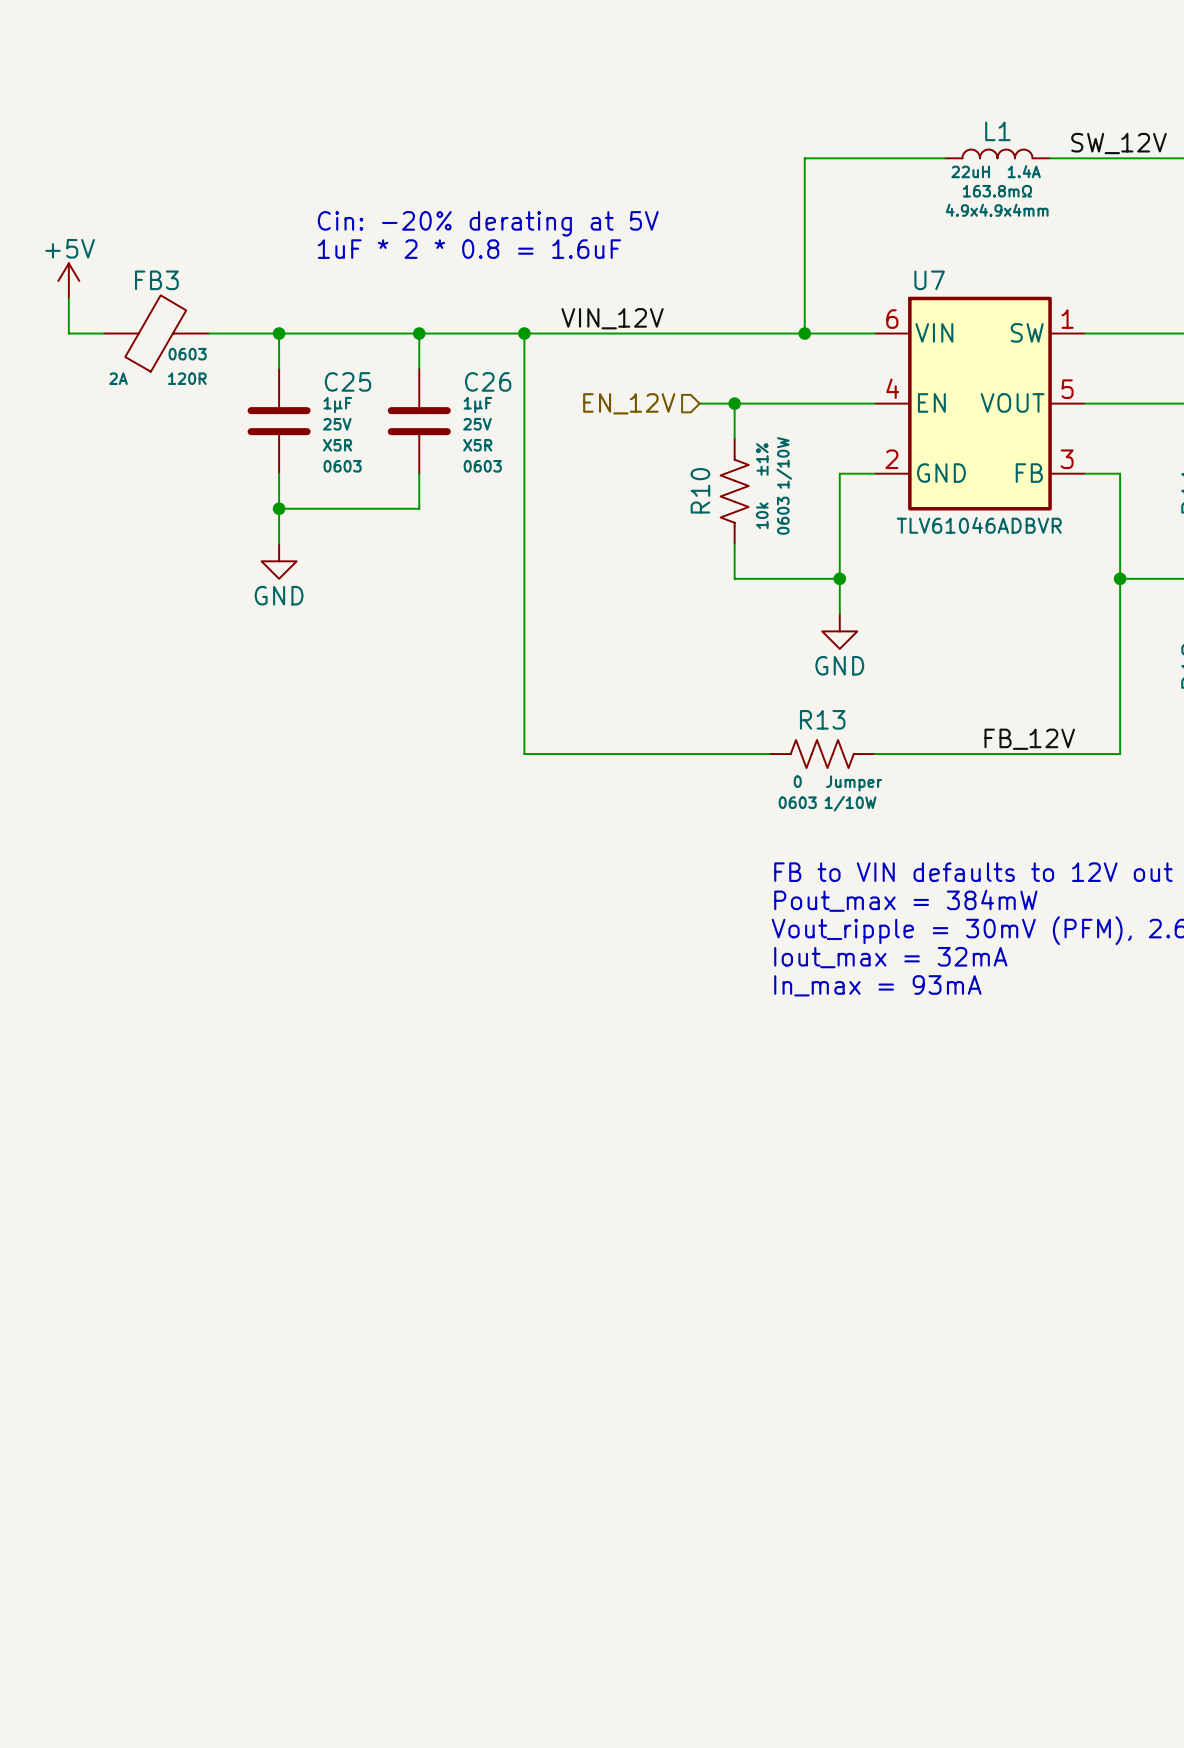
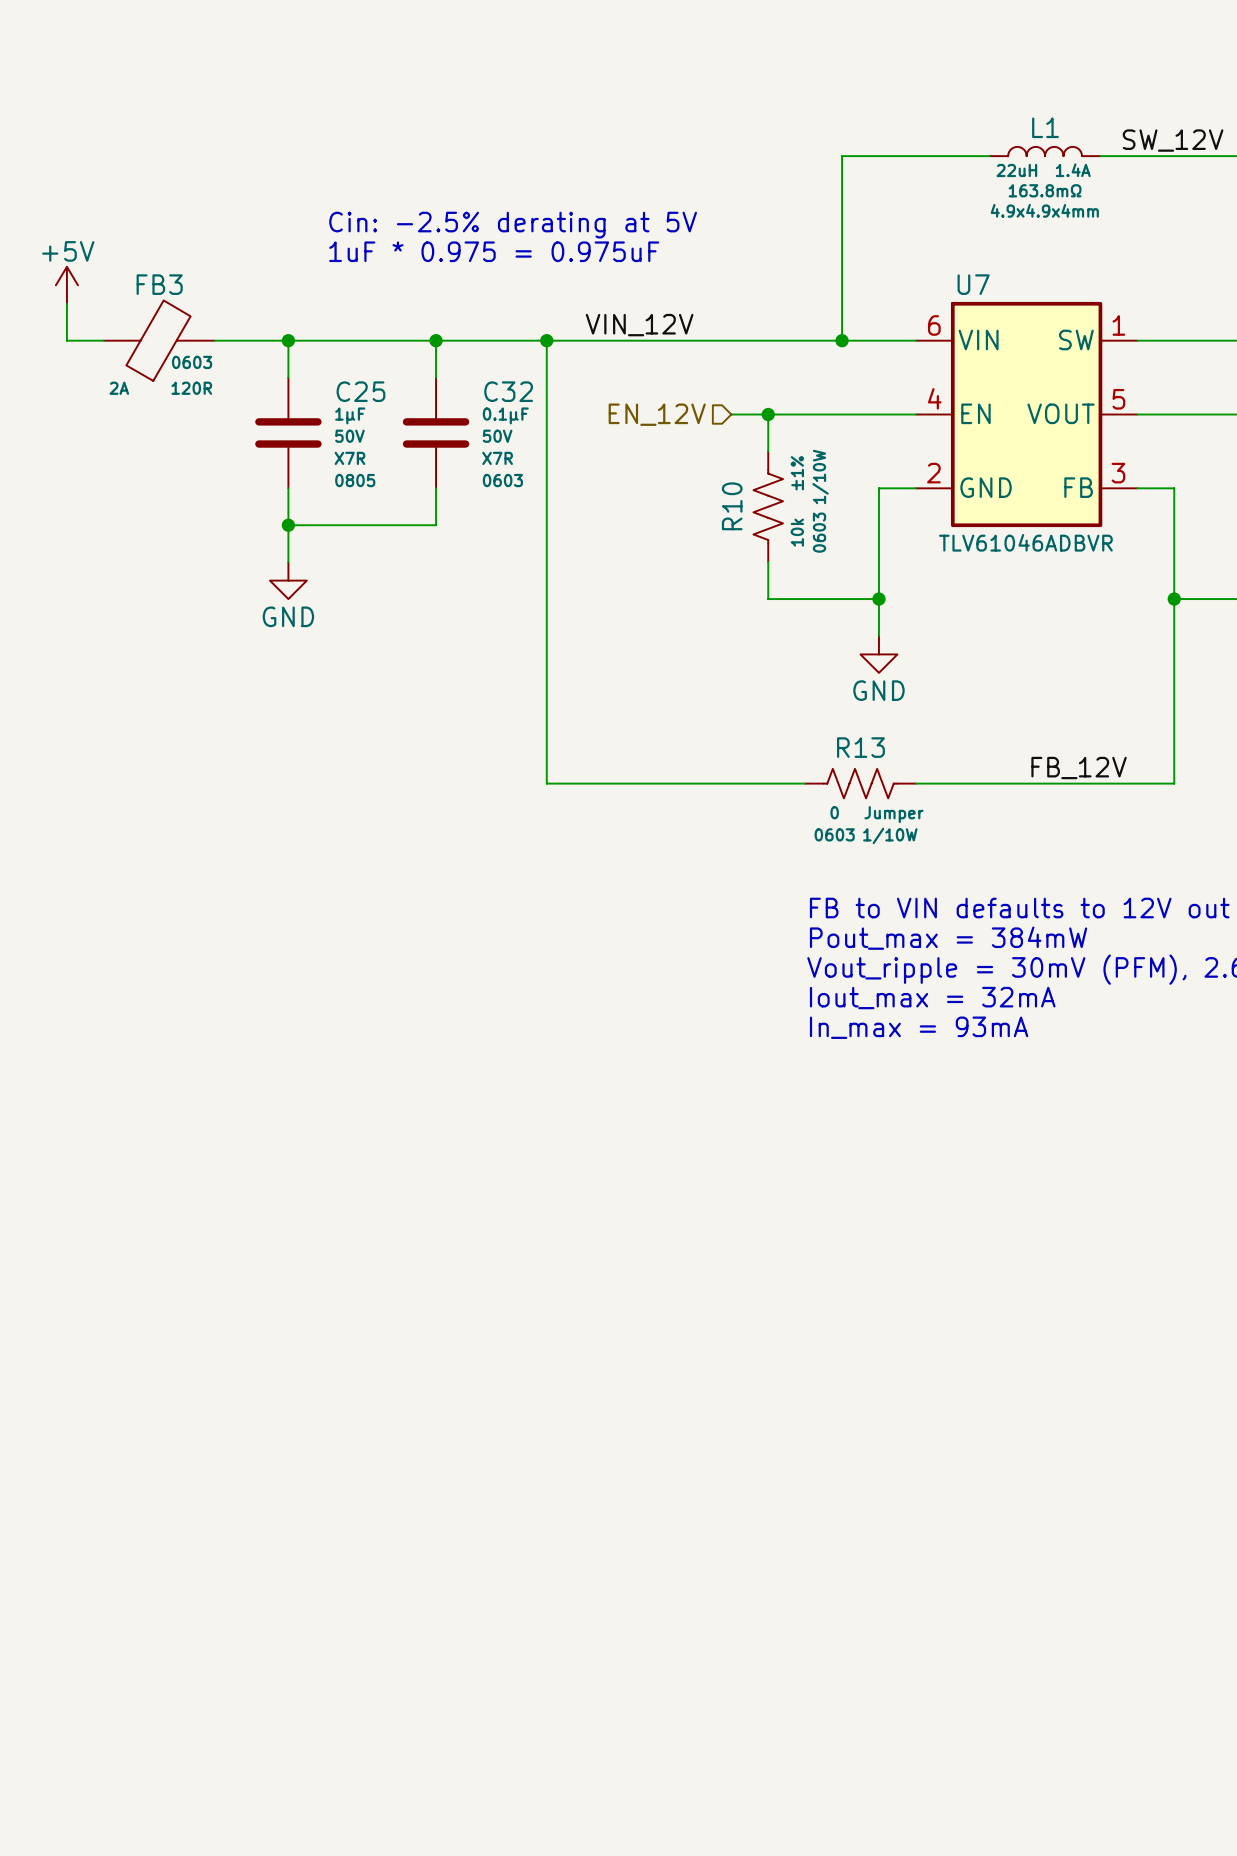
text: Cin: -20% derating at 5V (488, 223) -> Cin: -2.5% derating at 5V (513, 225)
text: 1uF * 2 * 0.8 = 1.6uF (469, 249) -> 1uF * 0.975 = 0.975uF (494, 251)
C26 name: C26 (488, 381) -> C32 (508, 391)
C26 text: 1µF (477, 404) -> 0.1µF (505, 415)
C25 text: 25V (337, 424) -> 50V (349, 436)
C26 text: 25V (477, 424) -> 50V (497, 436)
C25 text: X5R (337, 445) -> X7R (349, 458)
C26 text: X5R (477, 445) -> X7R (497, 458)
C25 text: 0603 (342, 466) -> 0805 (355, 480)

